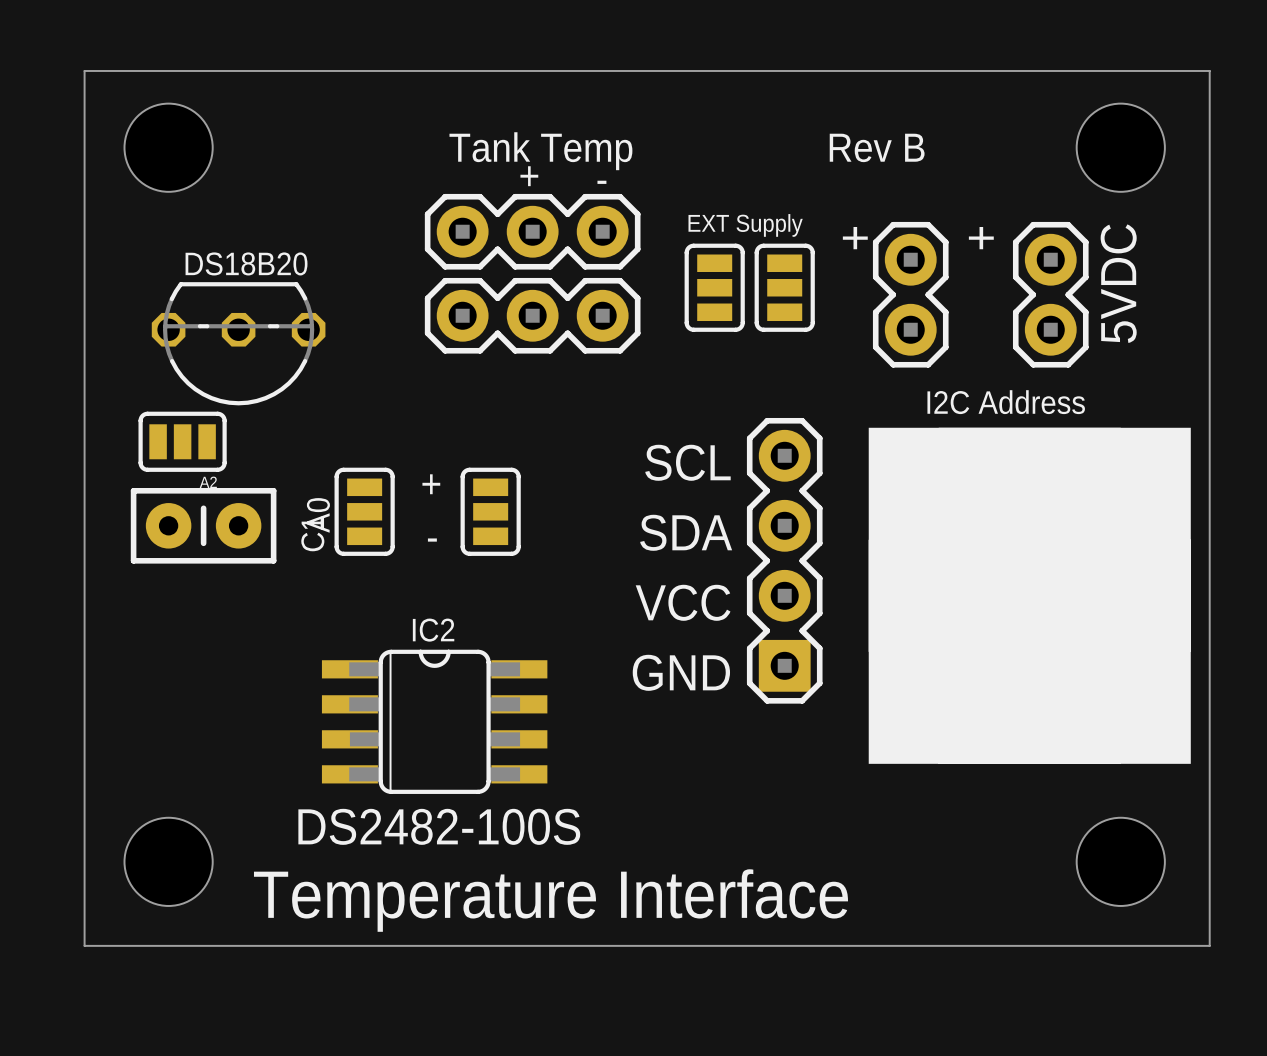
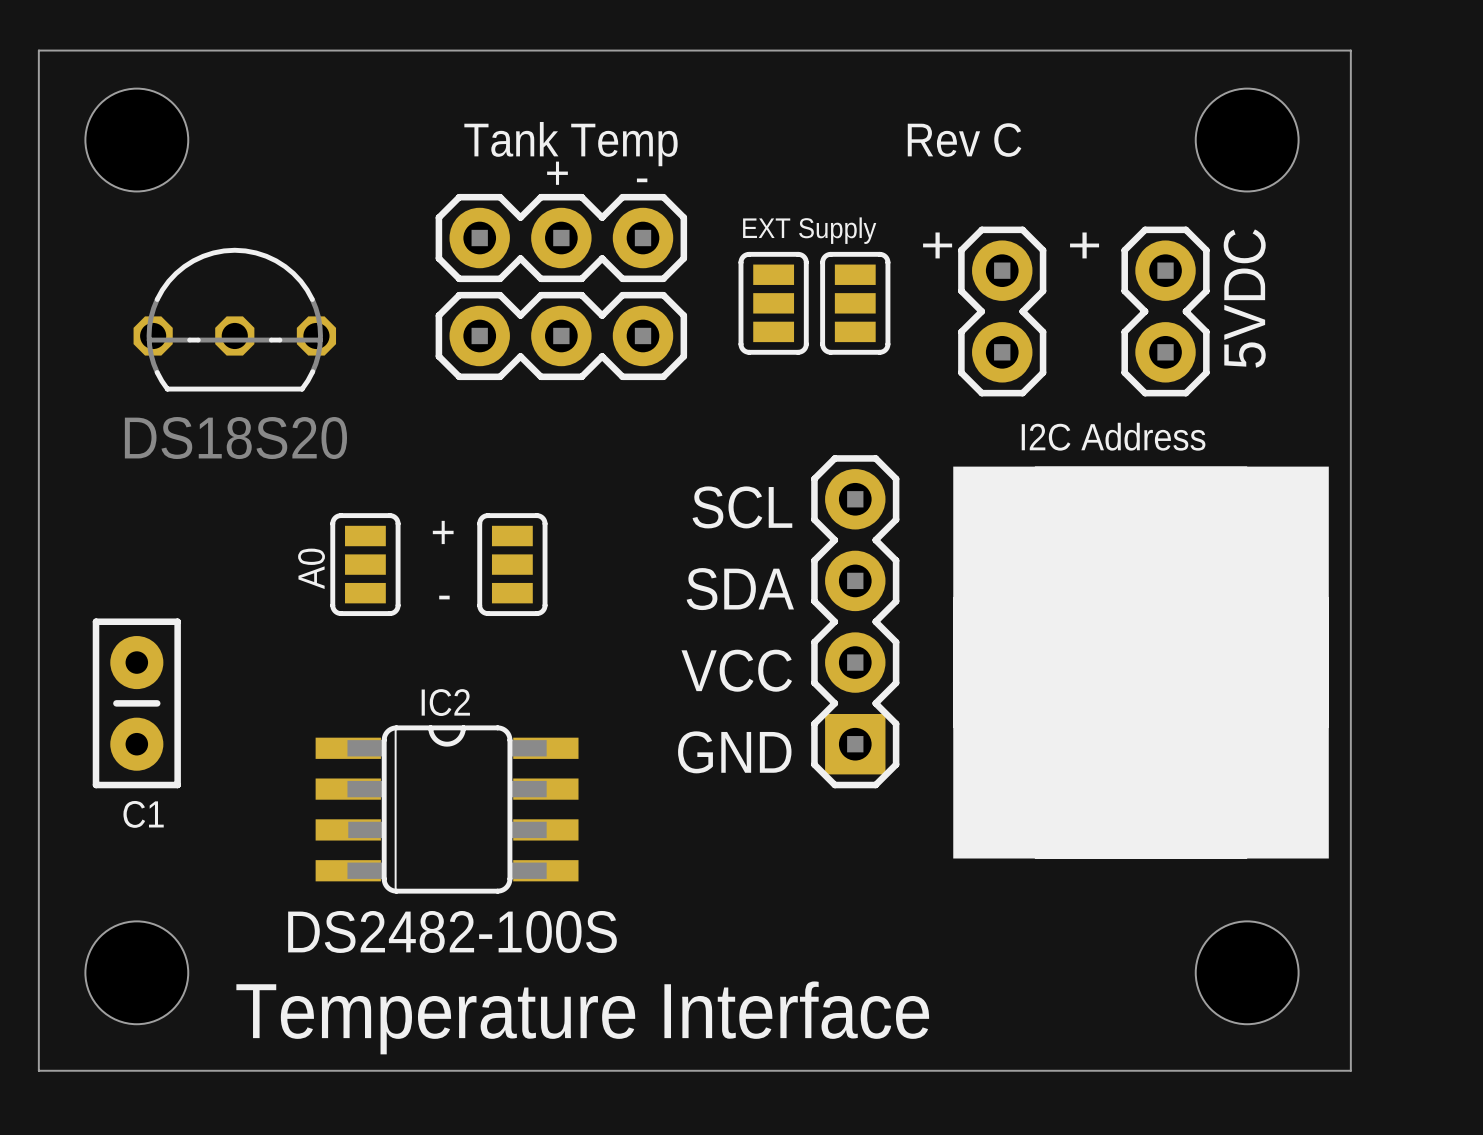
text: Rev B (877, 147) -> Rev C (964, 140)
part: none -> DS18S20 (234, 319)
part: DS18B20 (238, 343) -> none
A2: (182, 441) -> none
C1 rotation: 0° (203, 525) -> 90° clockwise (136, 703)
C1 position: (203, 525) -> (136, 703)

